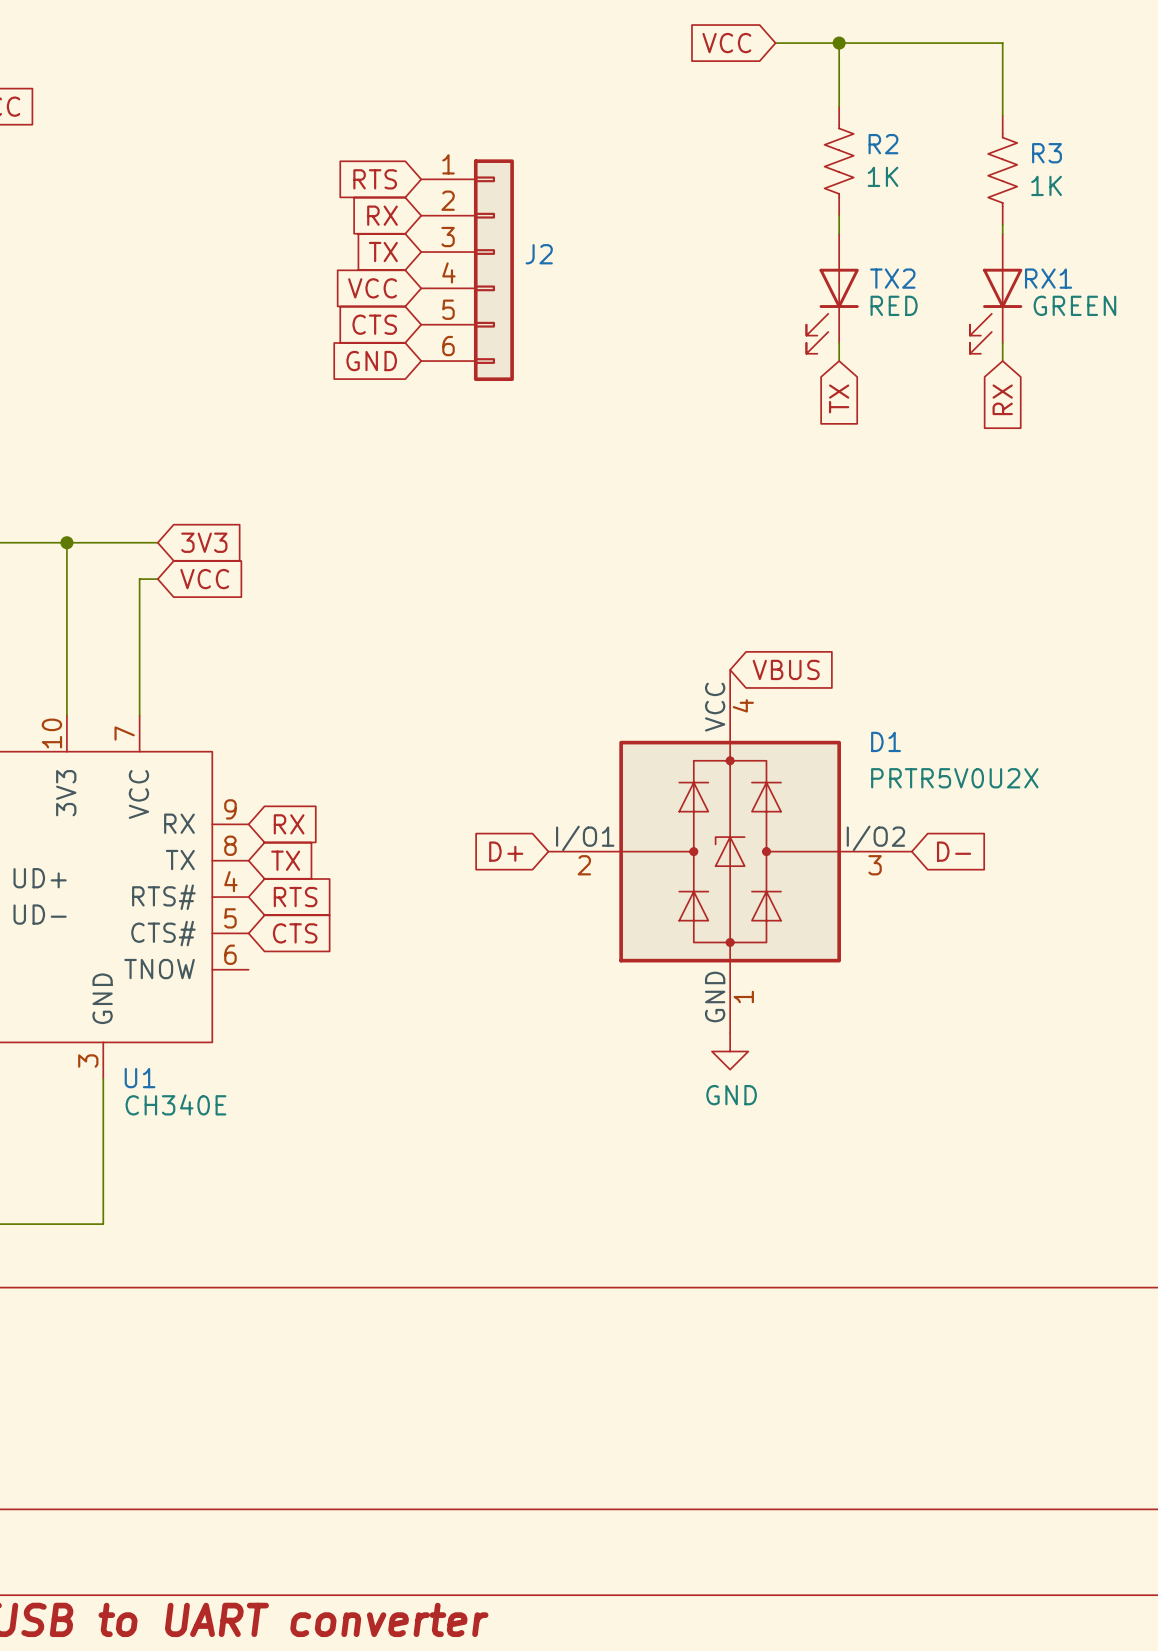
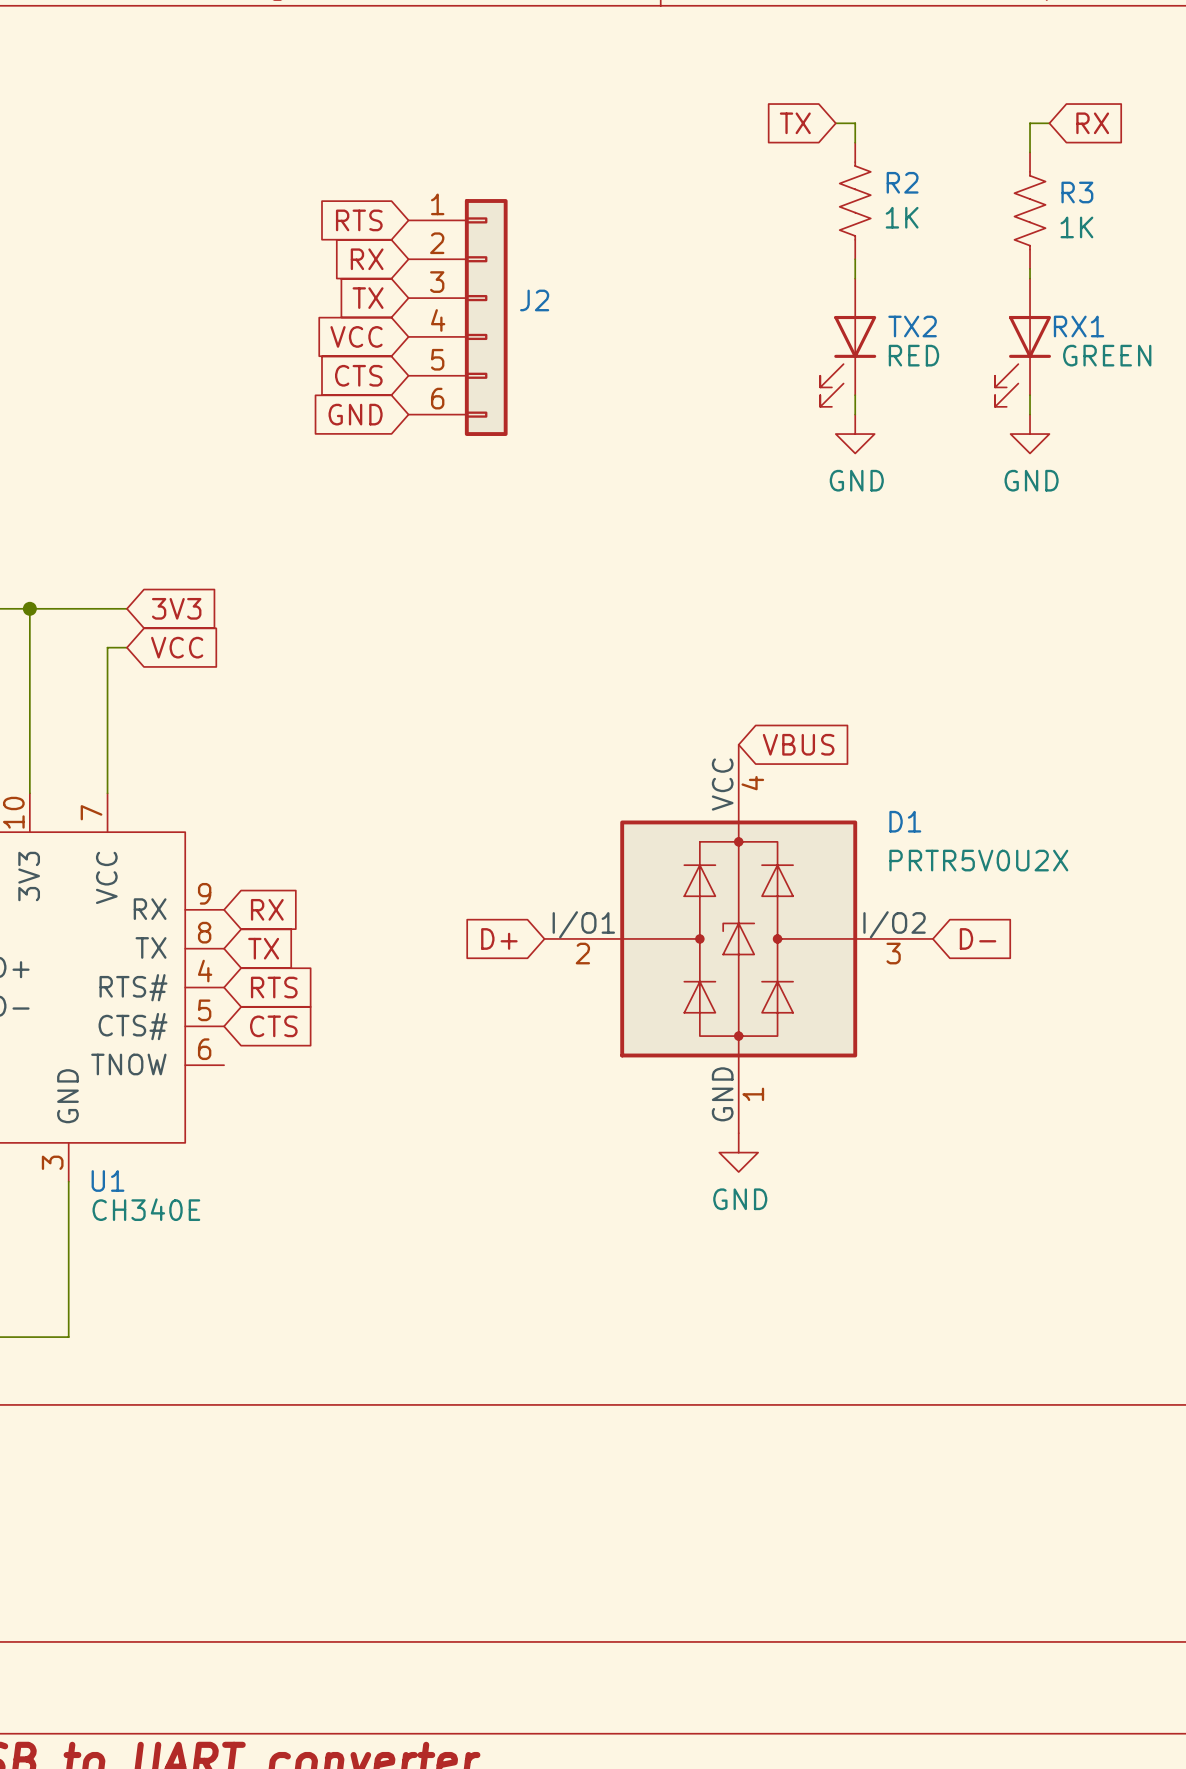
global label: VCC (726, 43) -> none
wire: (775, 43) (1002, 43) (1002, 88) -> (1049, 123) (1030, 123)
wire: (839, 43) (839, 88) -> (835, 123) (855, 123)
junction: (839, 43) -> none
power symbol: none -> GND (855, 434)
power symbol: none -> GND (1030, 434)
global label rotation: 0° (839, 398) -> 90° clockwise (795, 123)
global label position: TX (839, 398) -> TX (795, 123)
global label rotation: 0° (1002, 399) -> 90° counterclockwise (1092, 123)
global label position: RX (1002, 399) -> RX (1092, 123)

